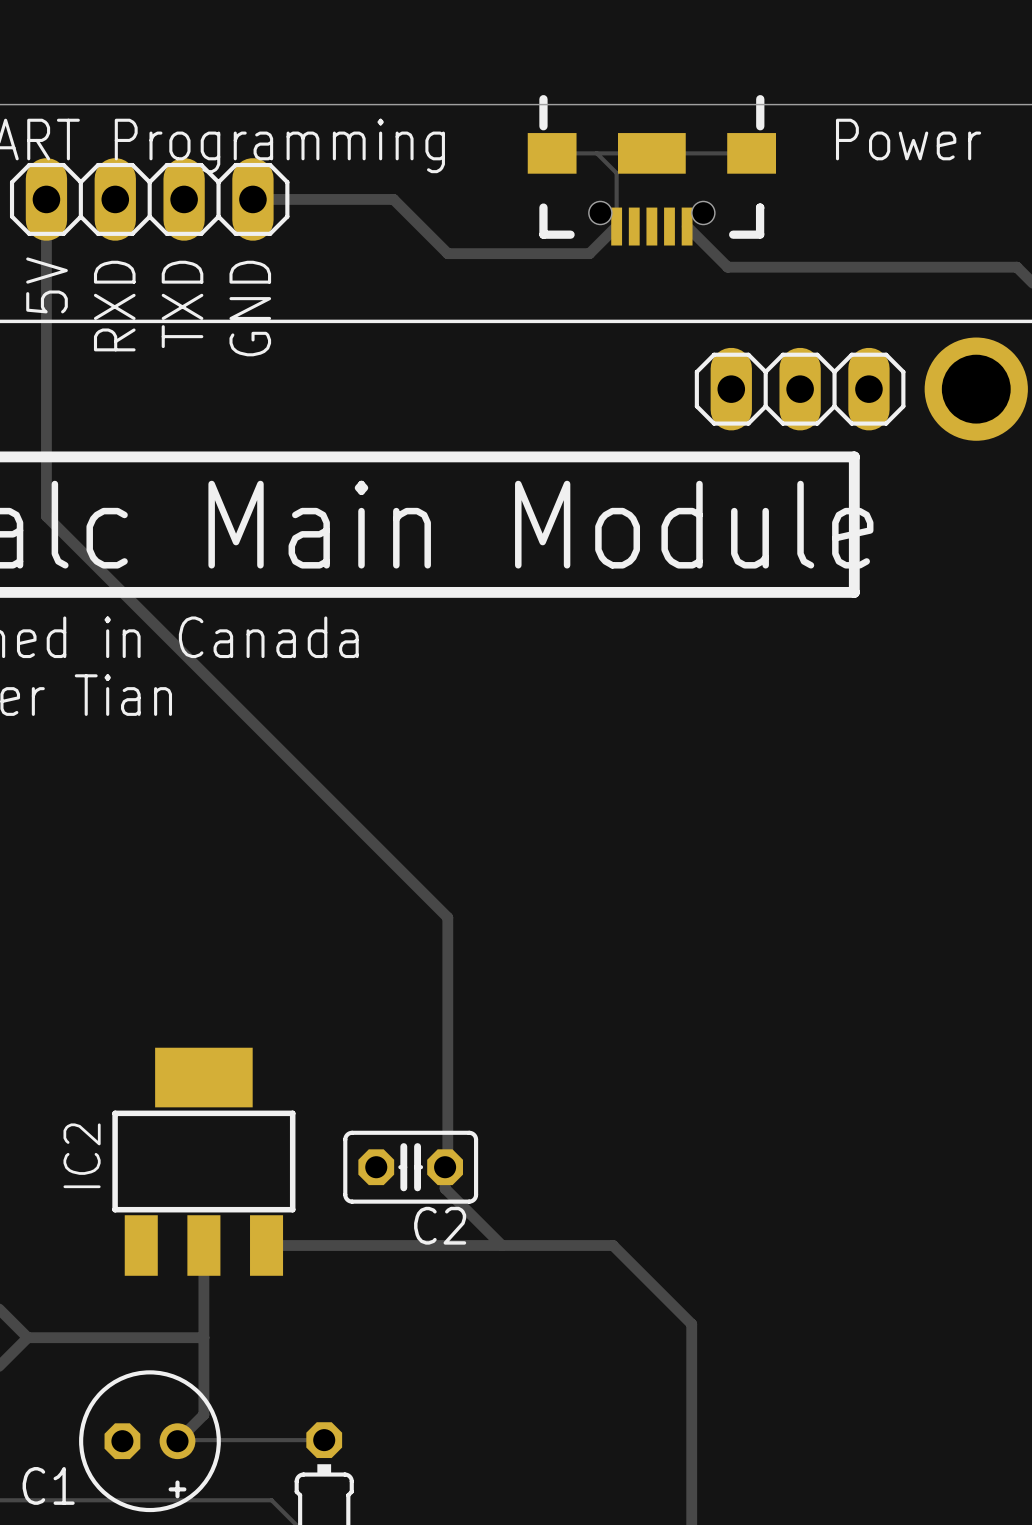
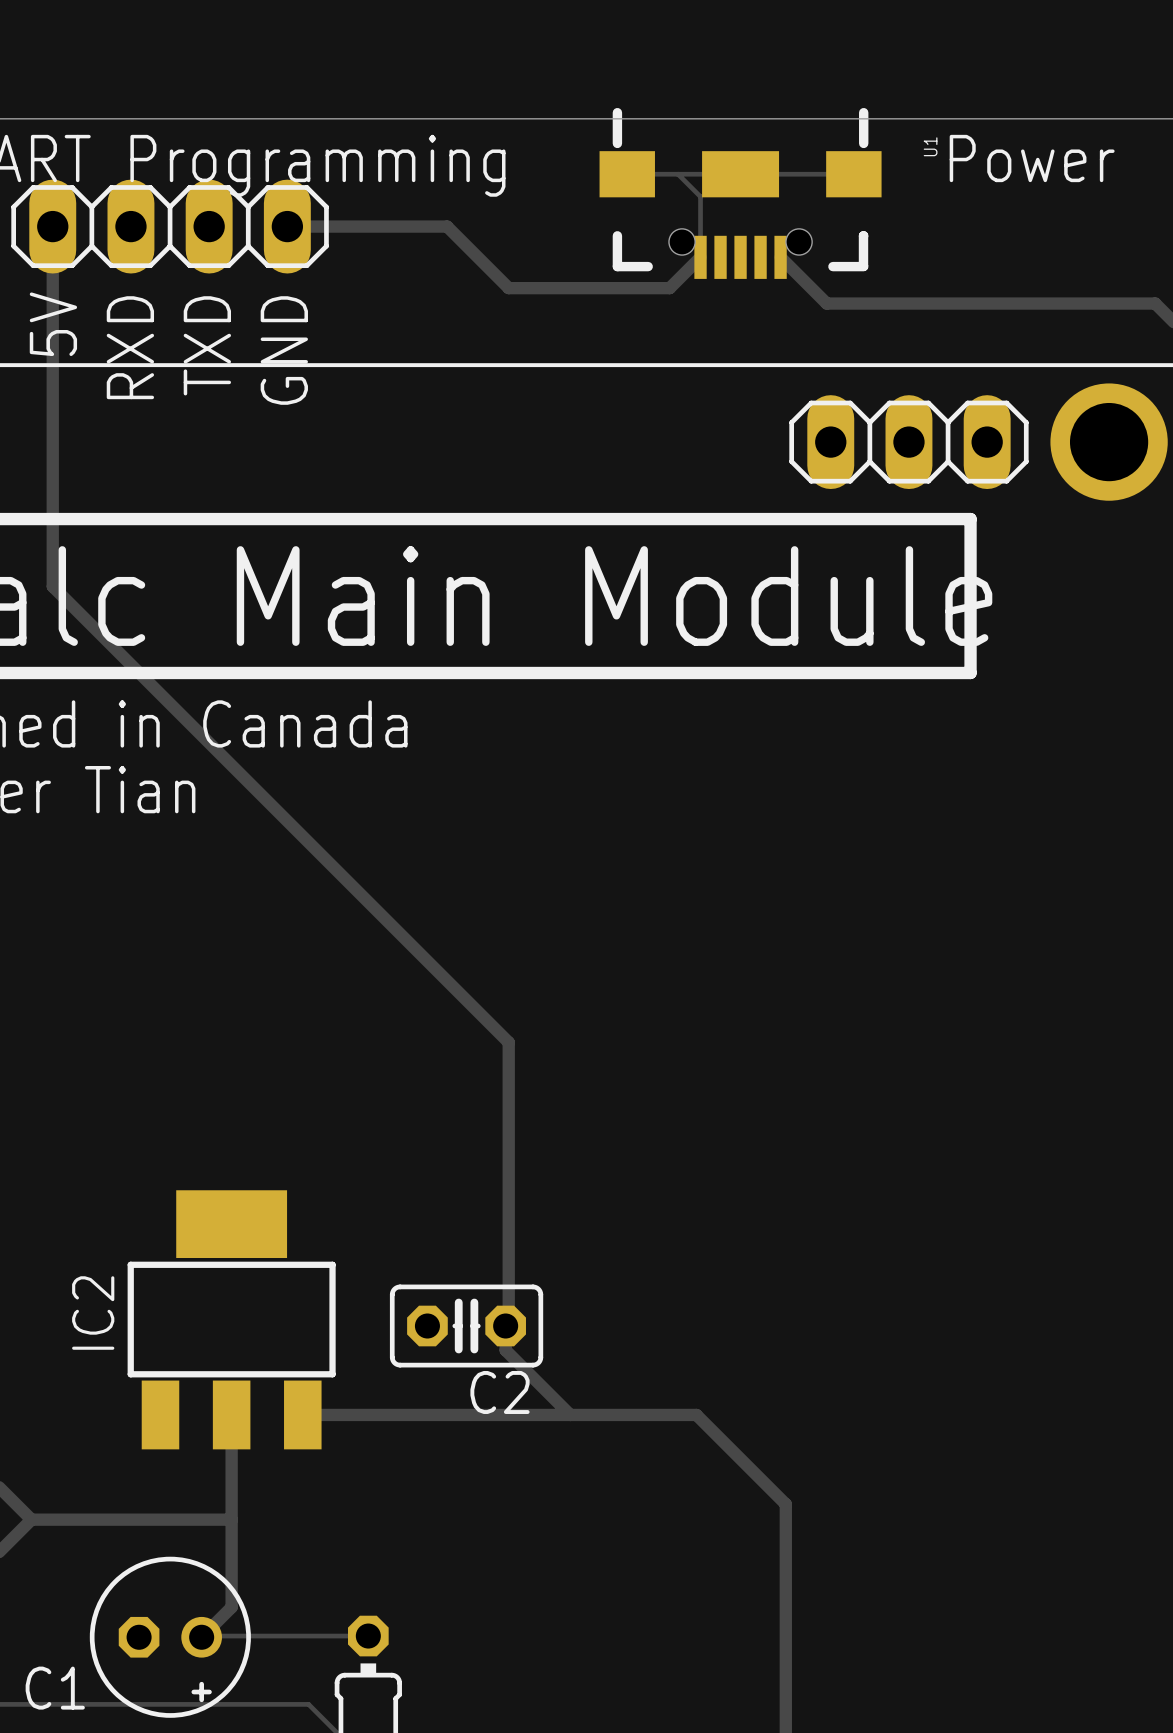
U1 name: none -> U1 (930, 146)

